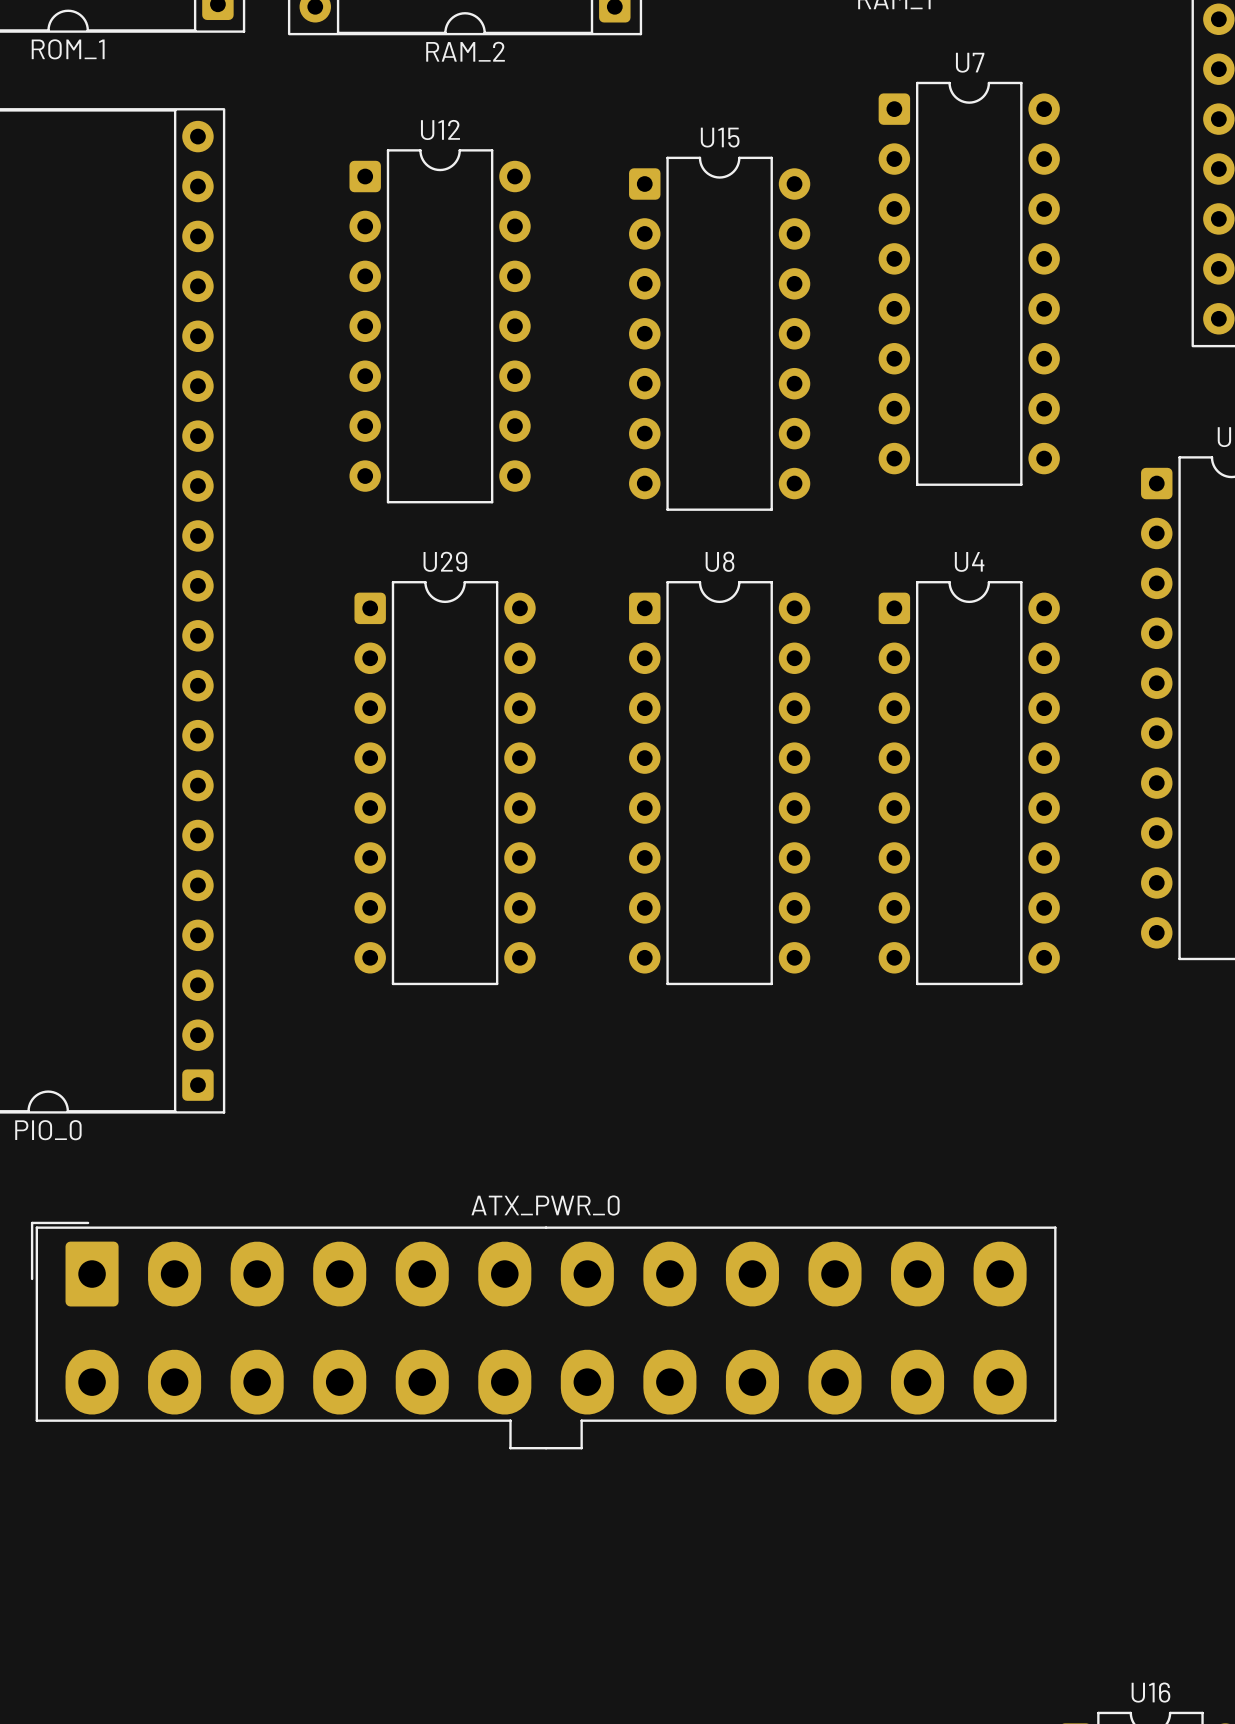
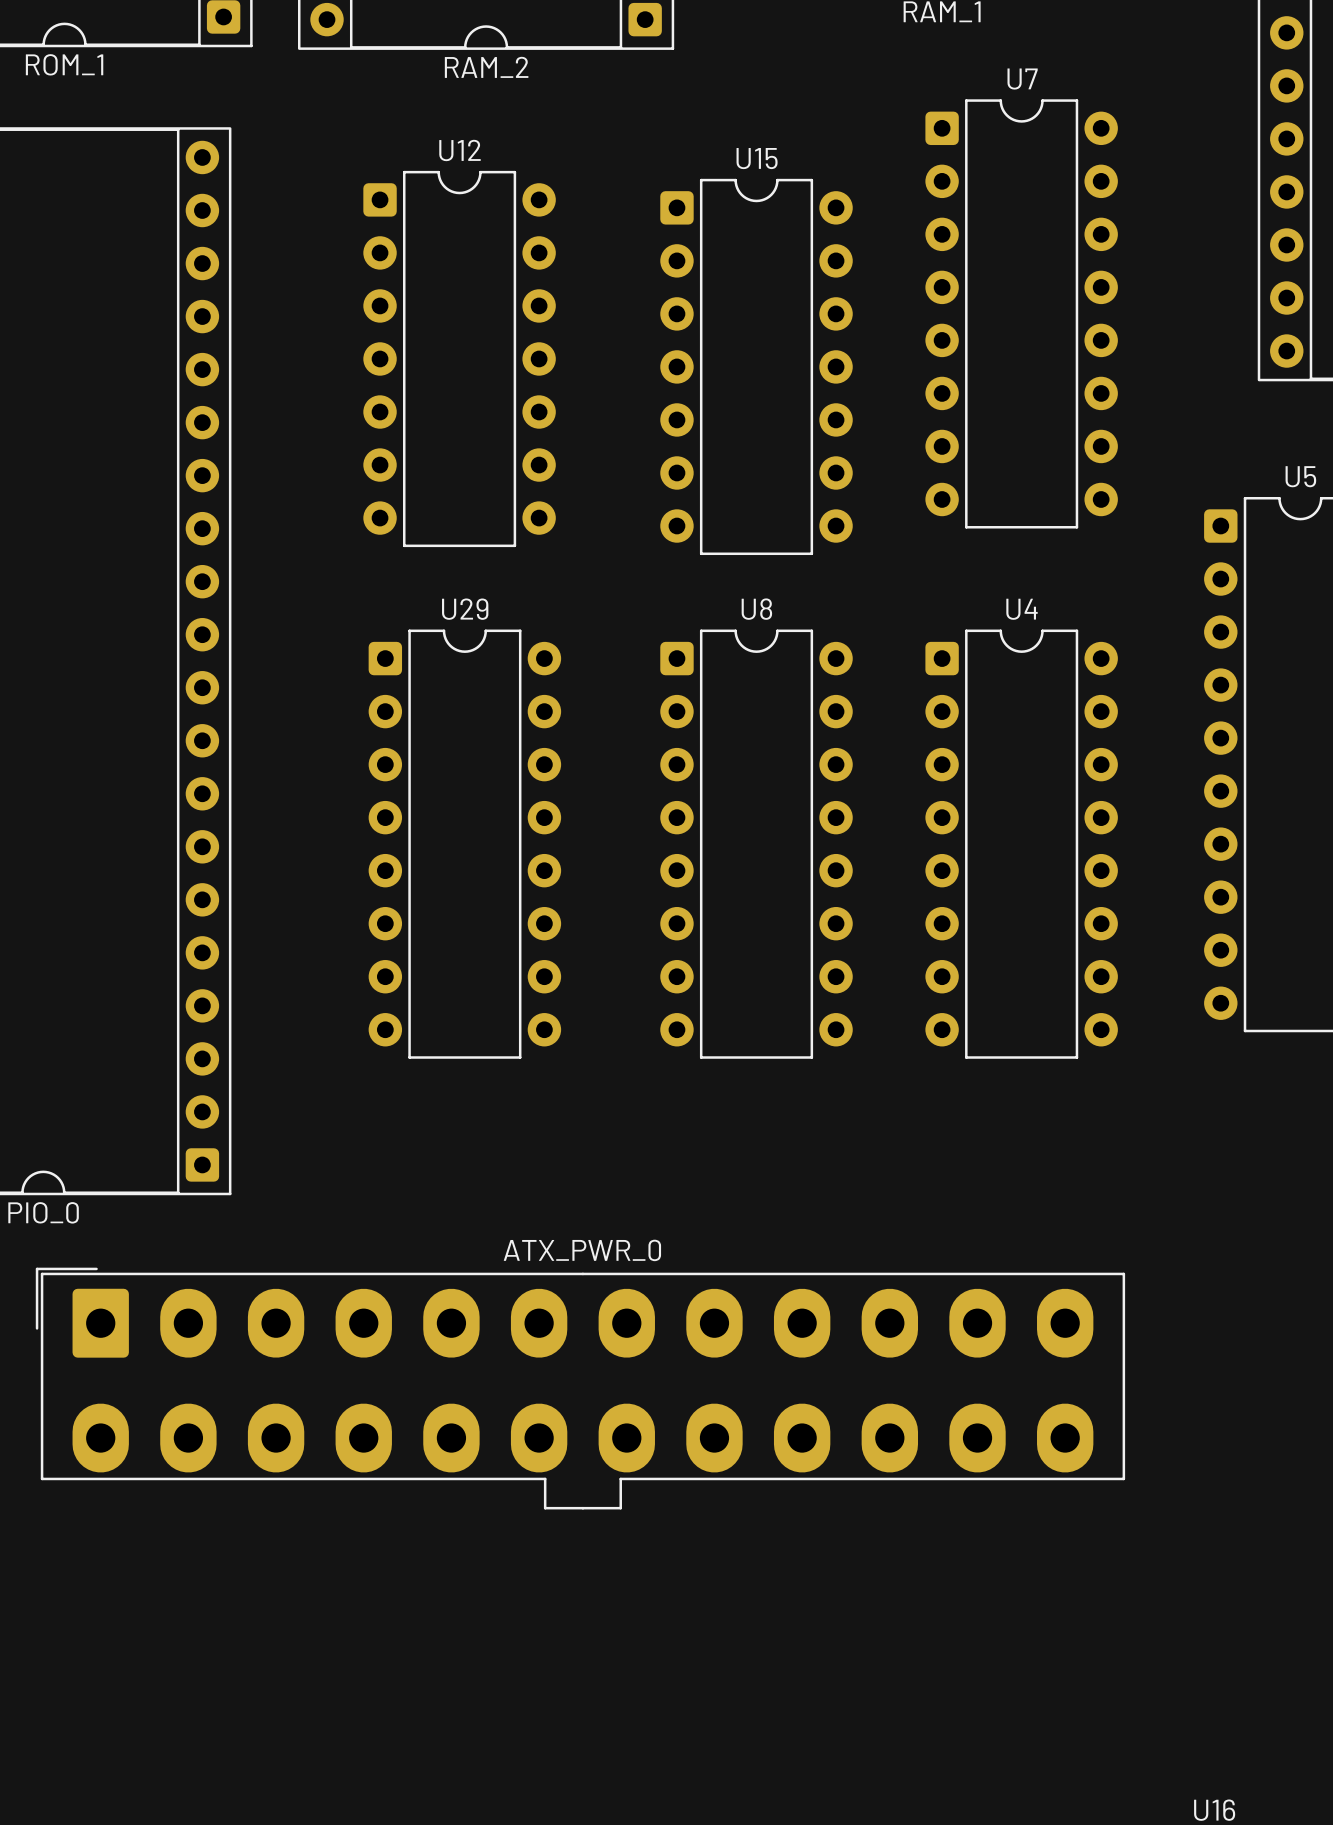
ATX_PWR_0 position: (543, 1335) -> (580, 1388)

